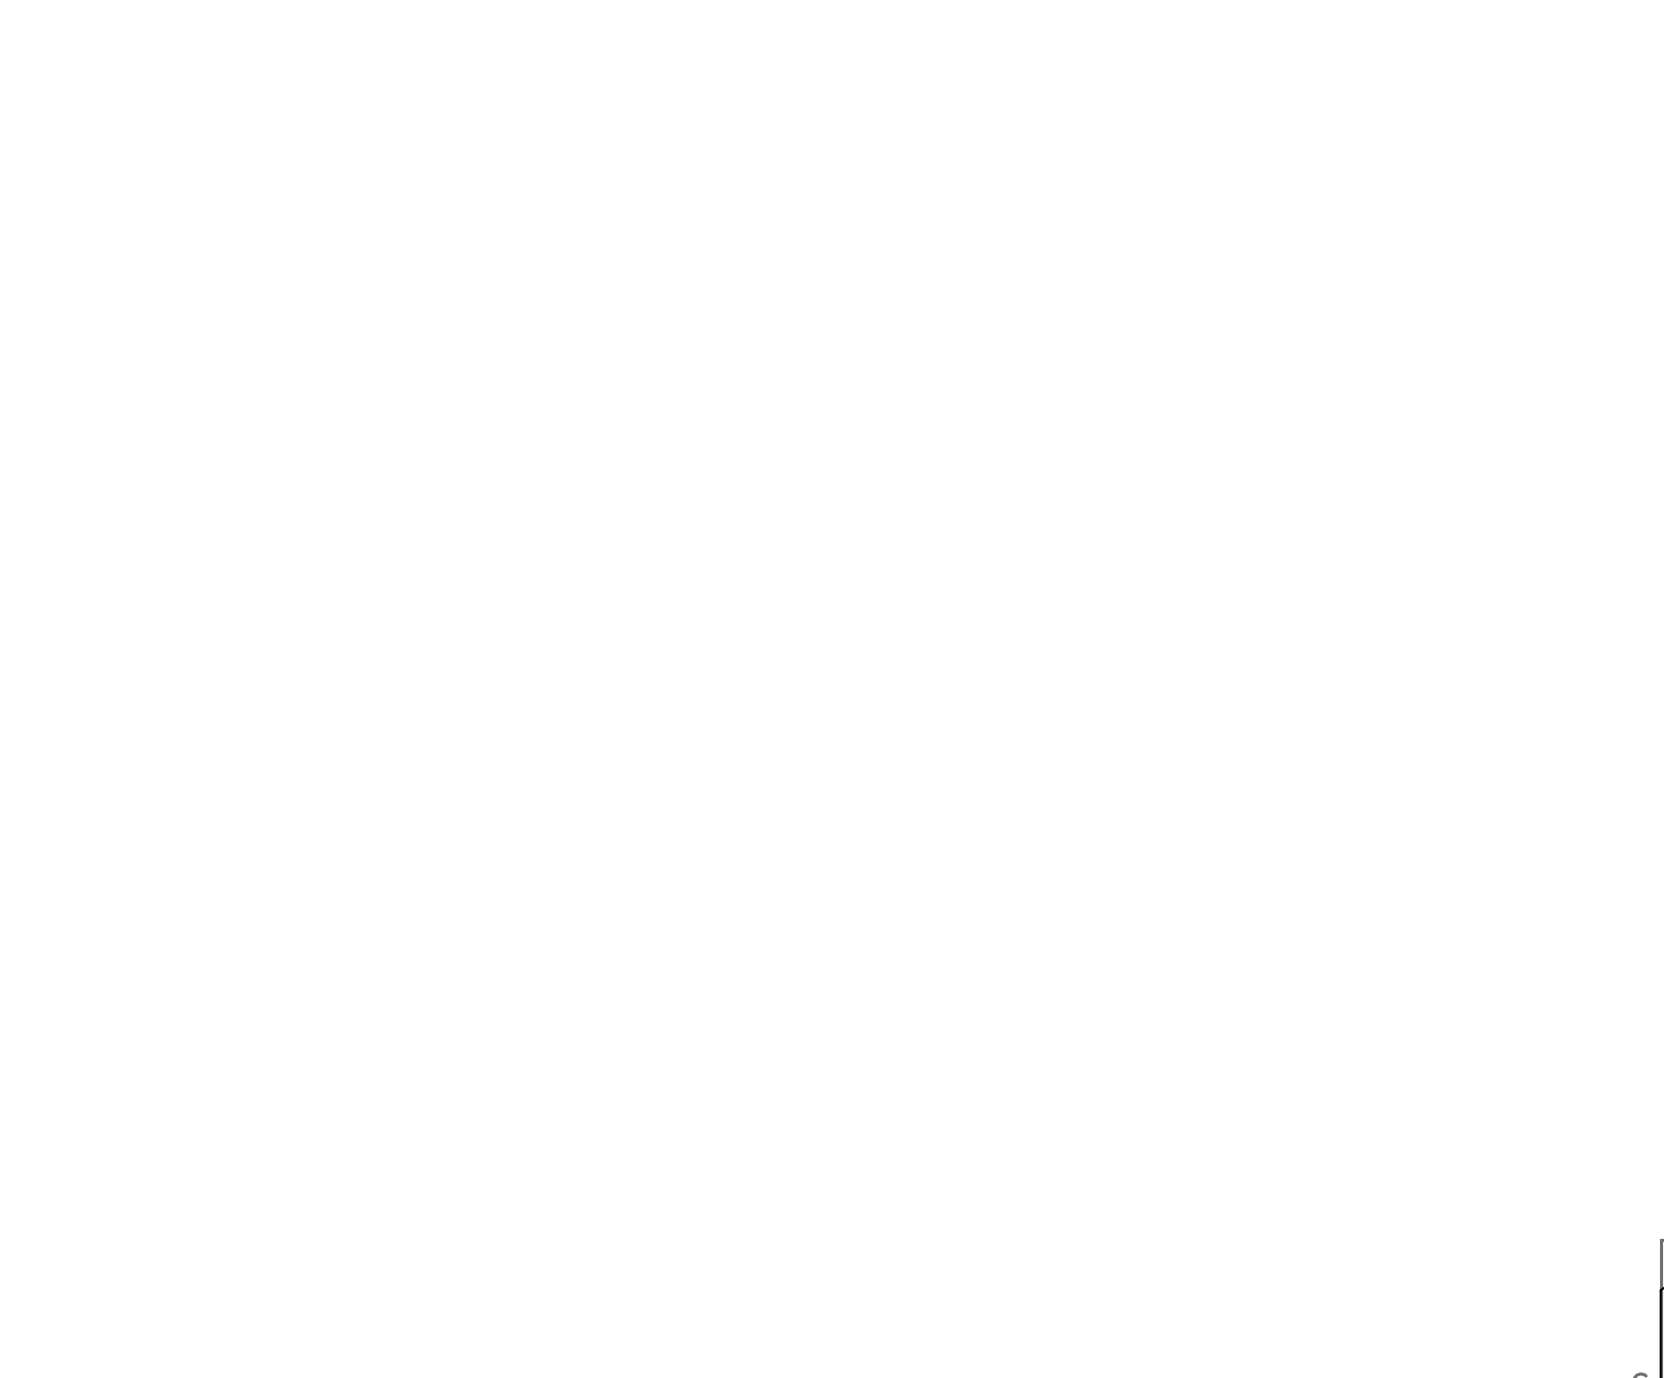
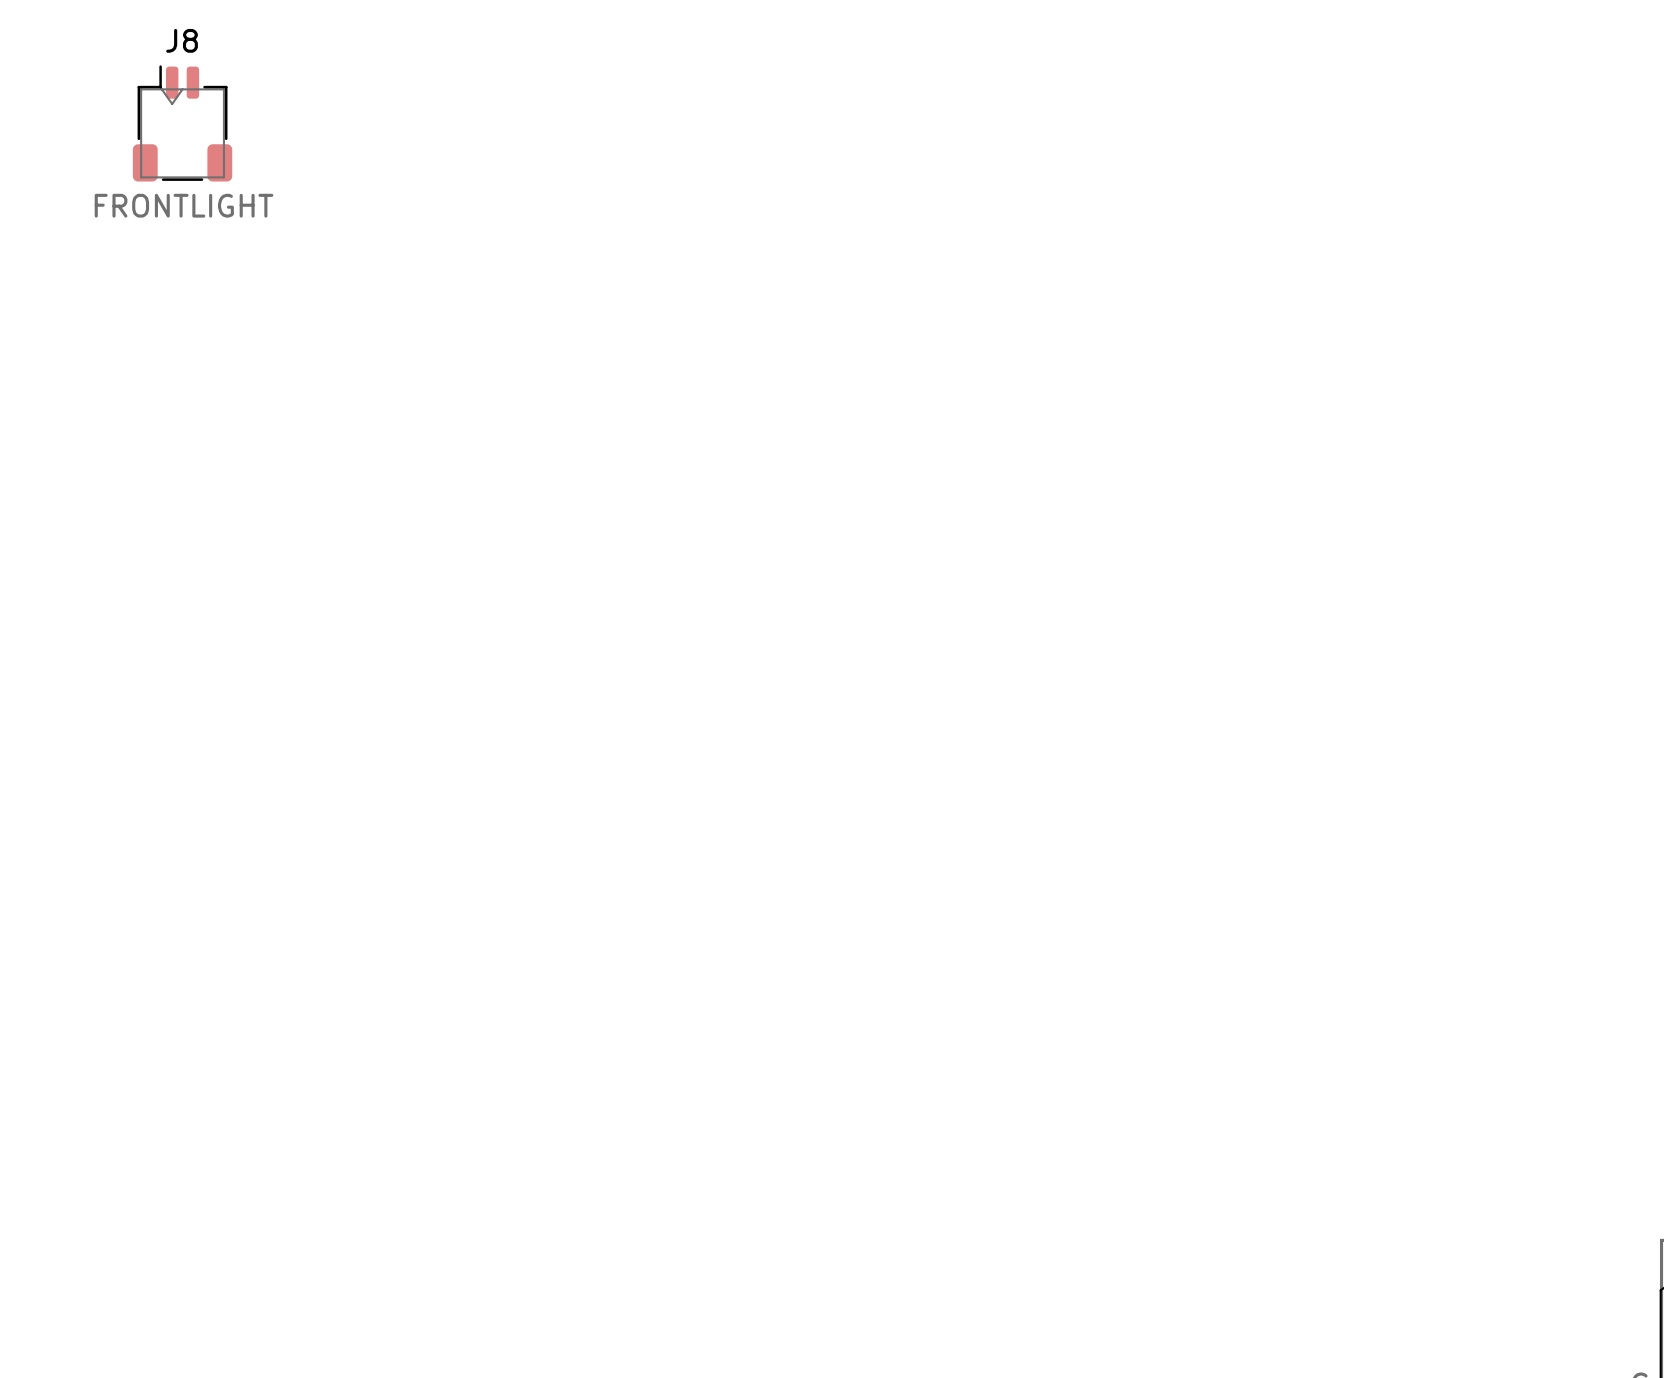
J8: none -> FRONTLIGHT (182, 123)

